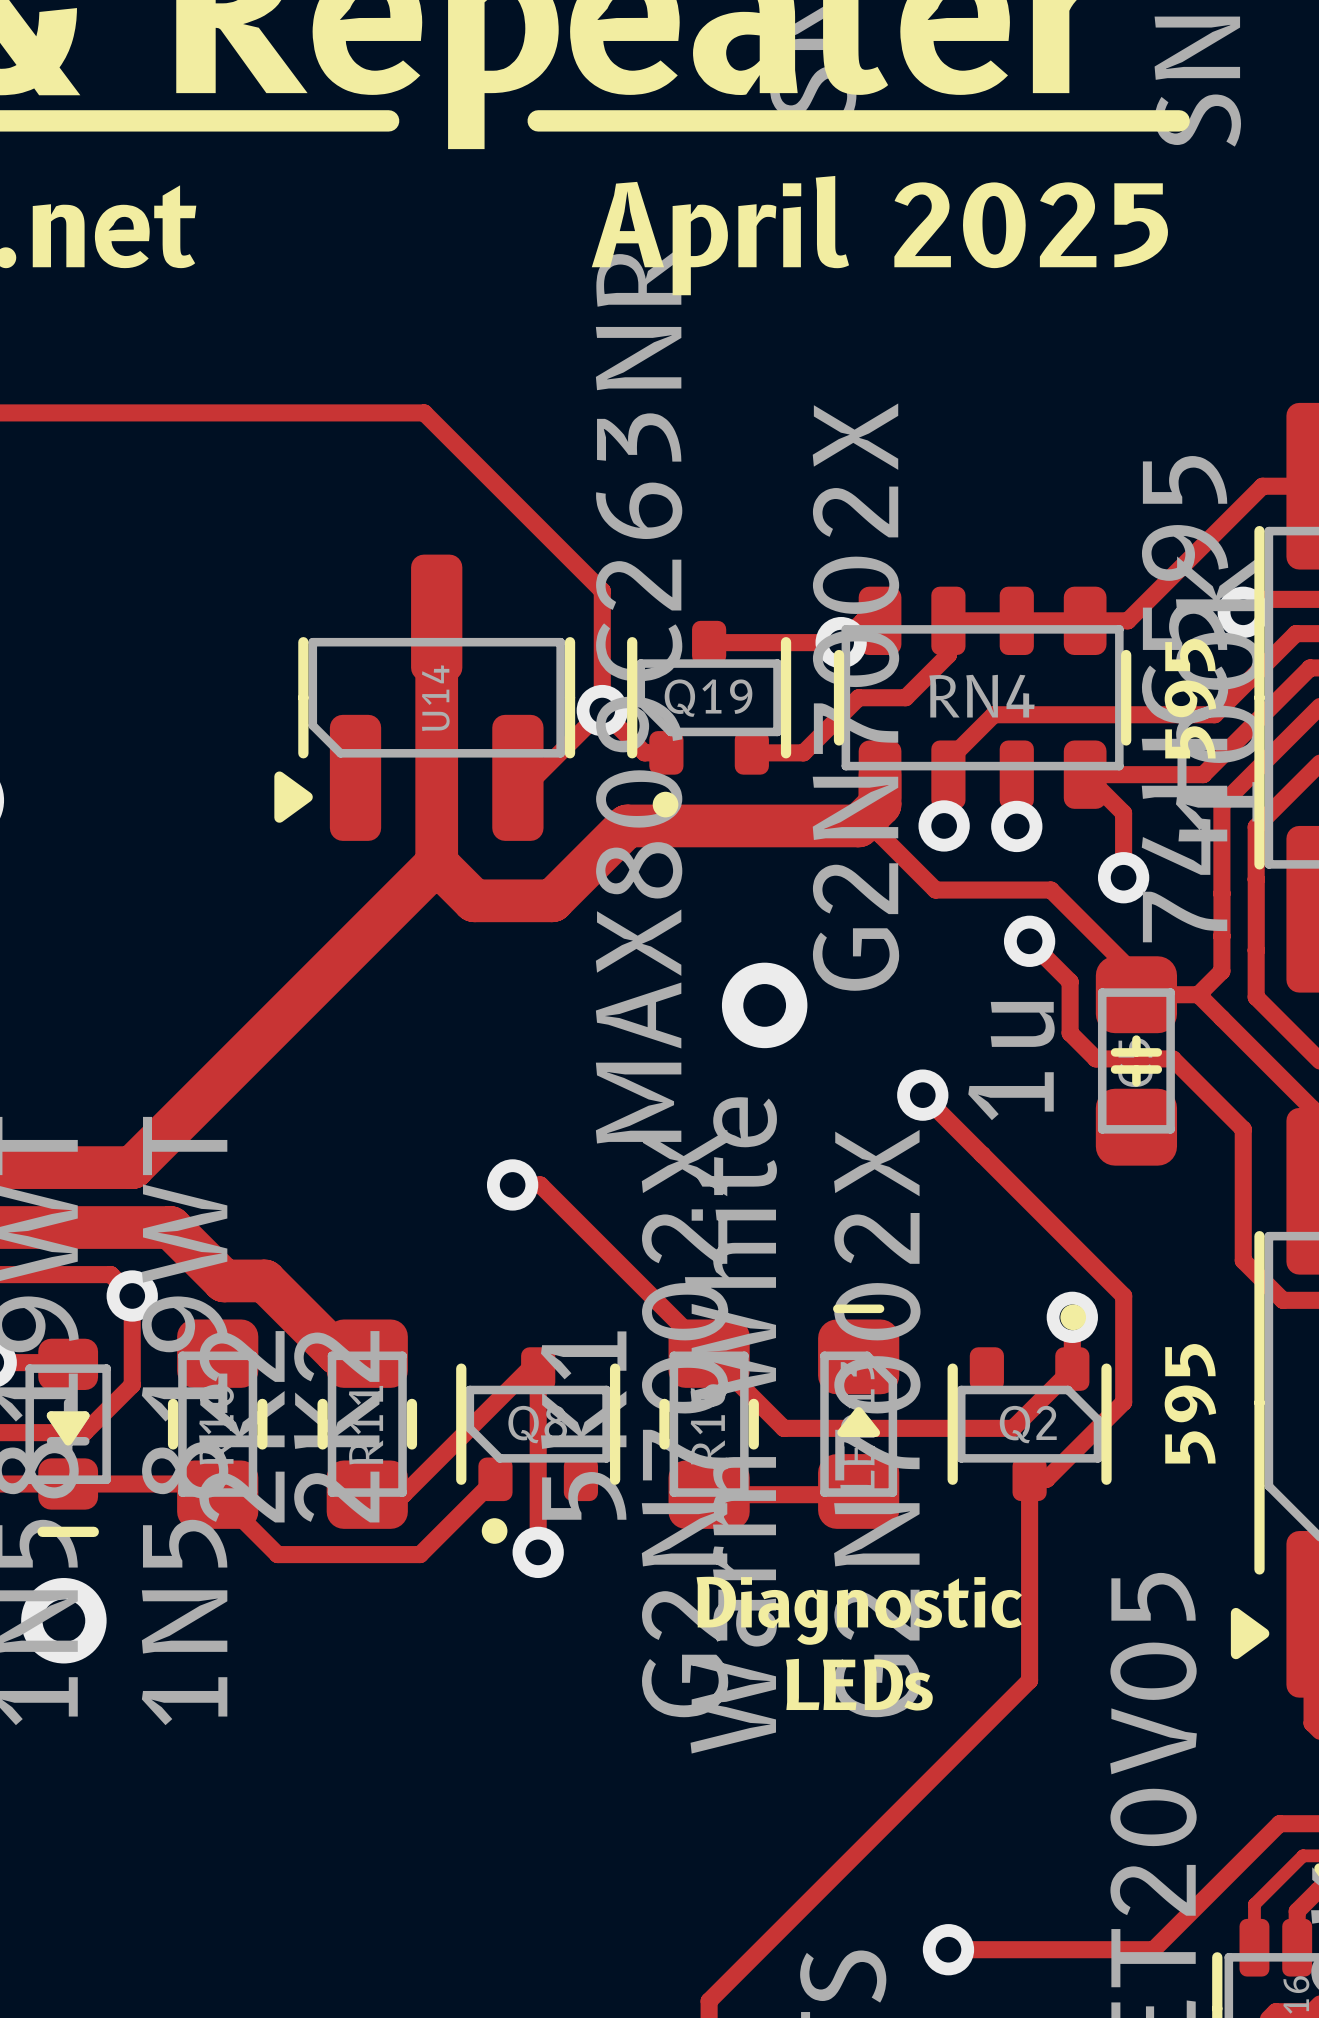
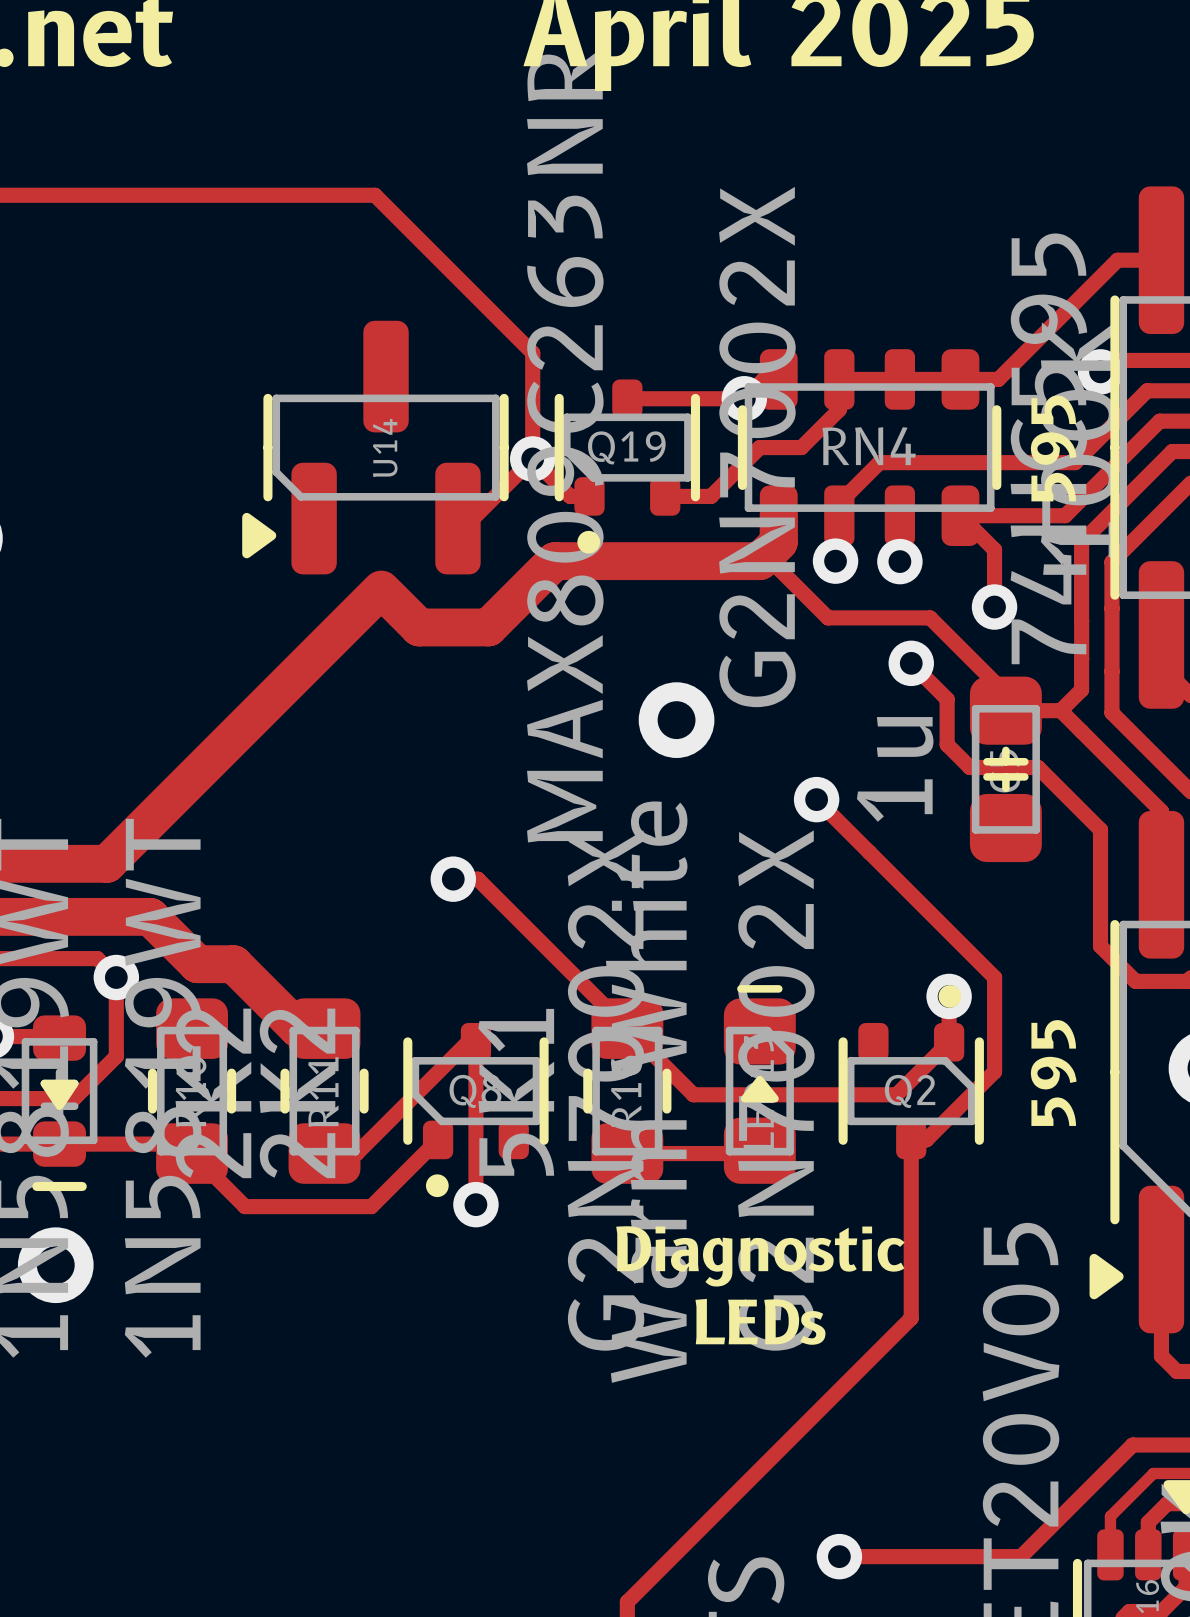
track: (436, 617) (436, 863) (132, 1167) (121, 1167) -> (381, 589) (107, 863)

